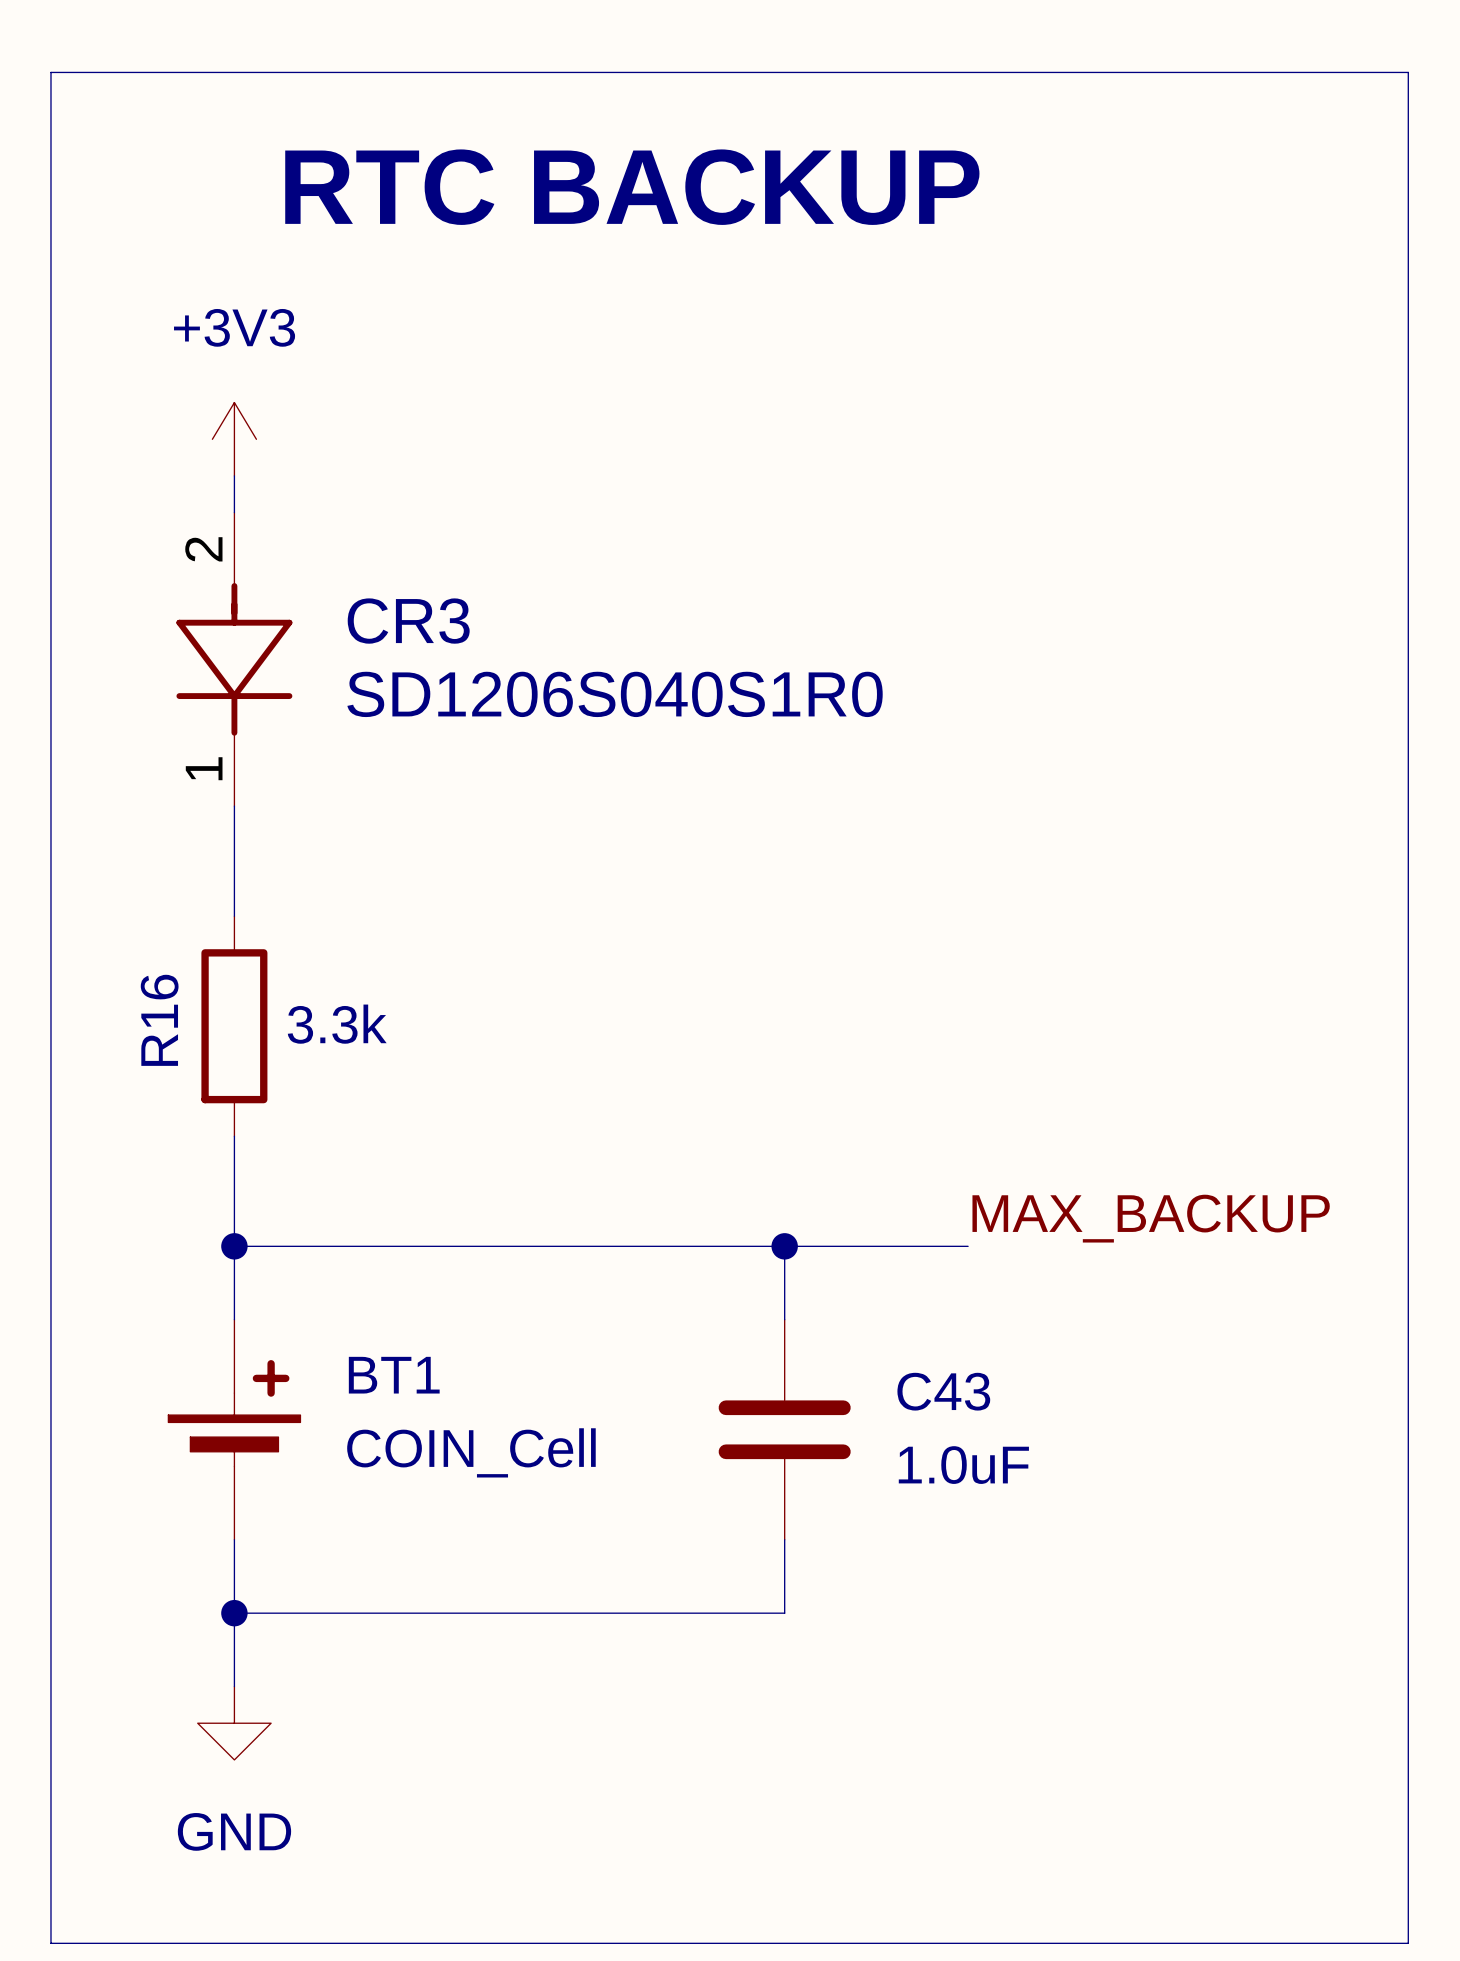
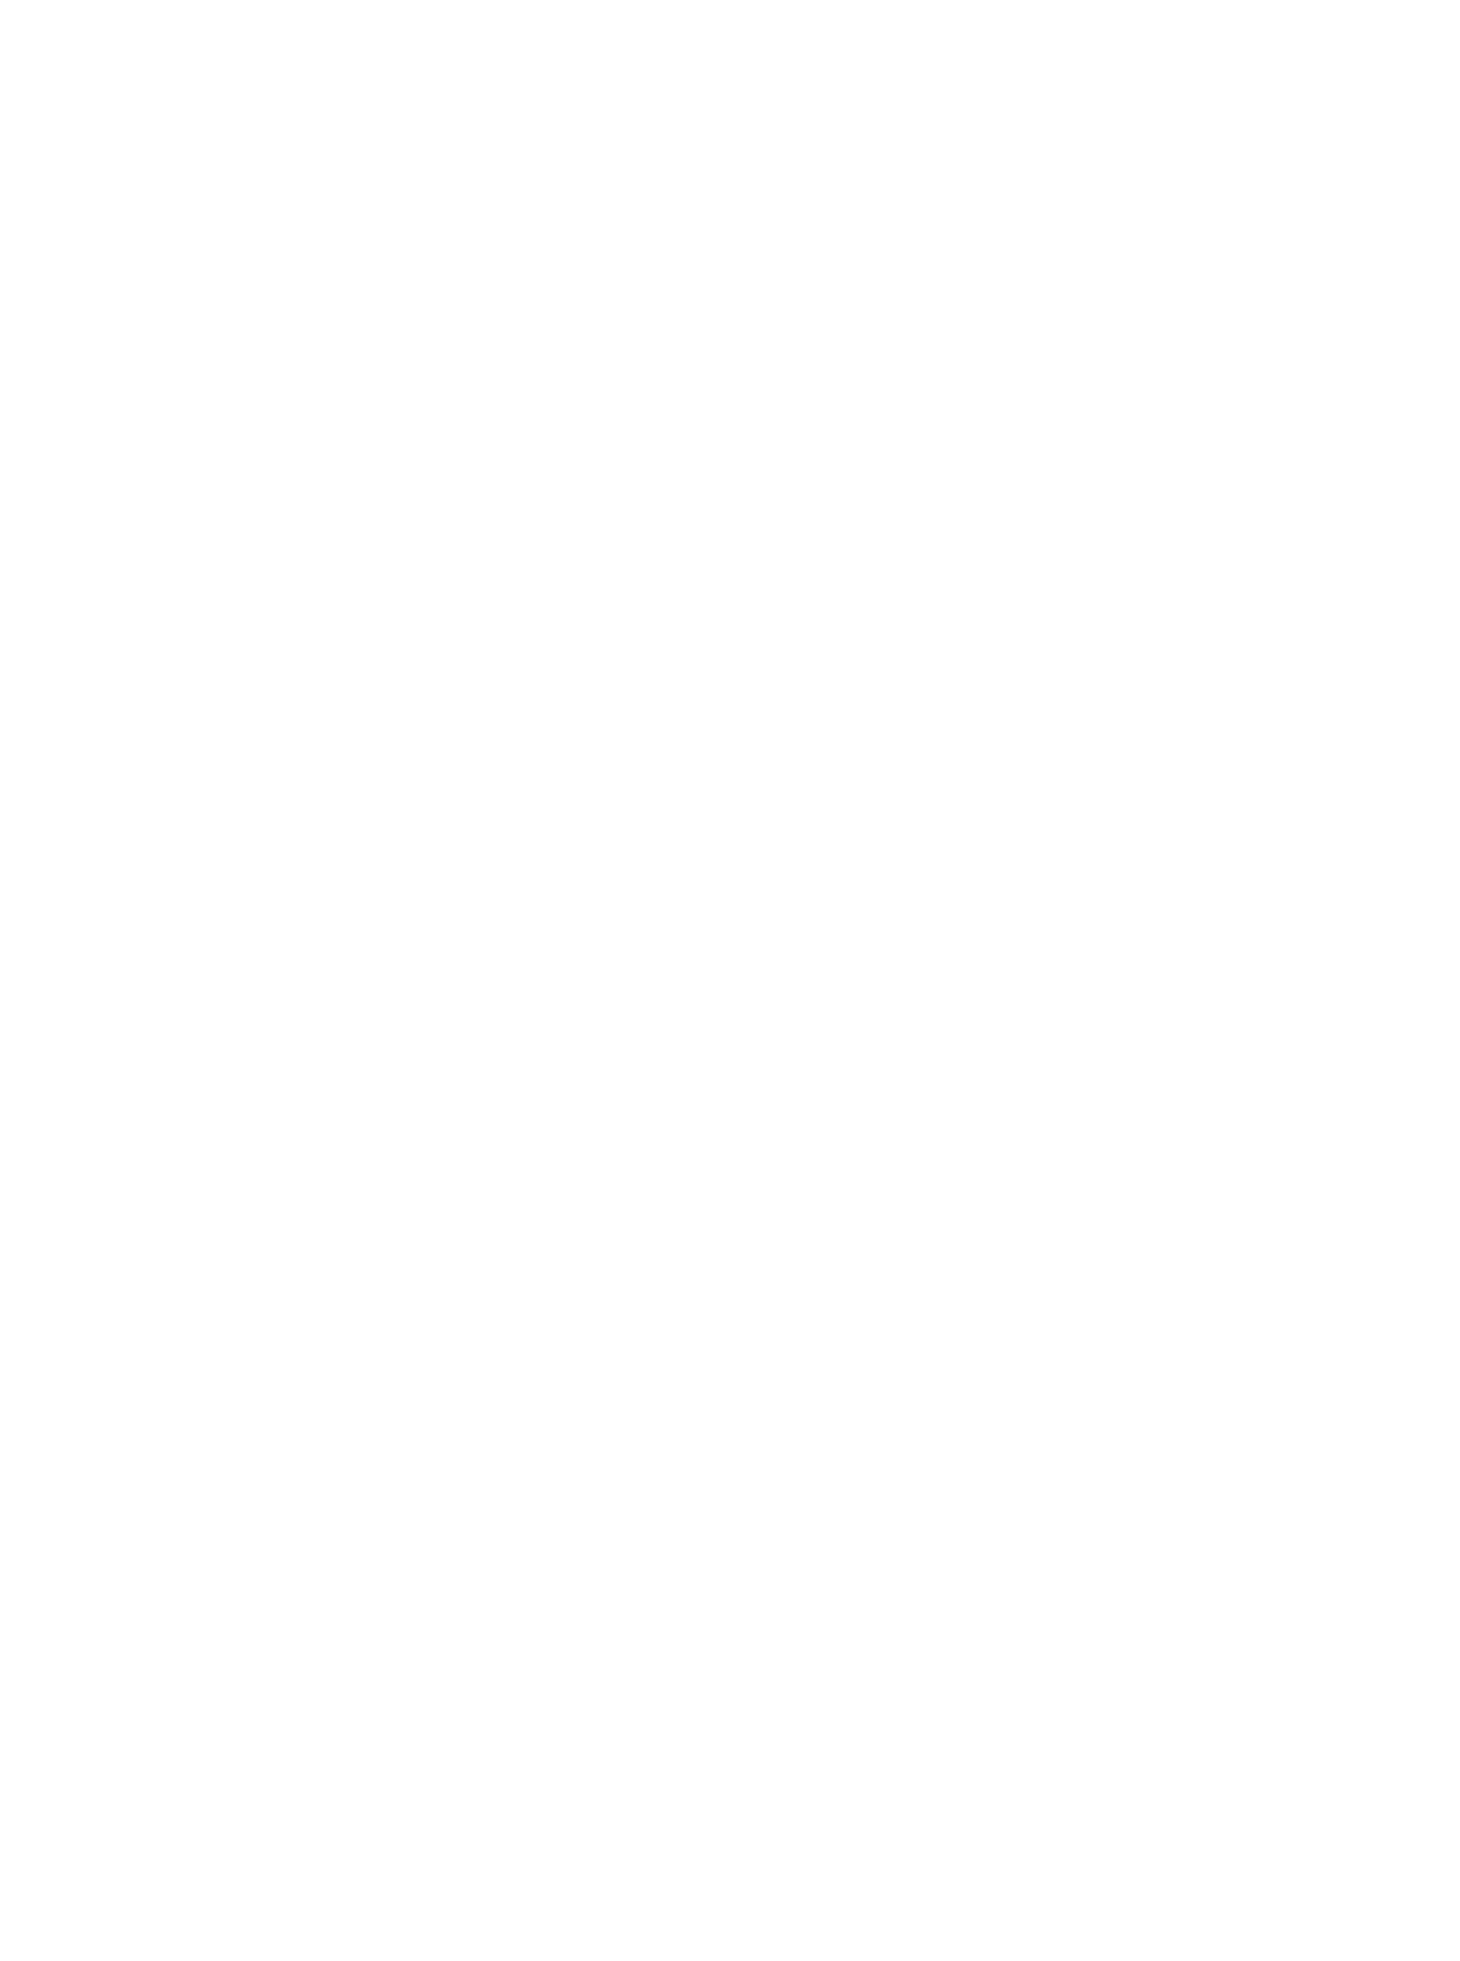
line: (50, 72) (1408, 72) (1408, 1943) (50, 1943) (50, 72) -> none
text: RTC BACKUP (632, 187) -> none
power symbol: +3V3 (234, 439) -> none
wire: (234, 475) (234, 512) -> none
CR3: SD1206S040S1R0 (234, 659) -> none
wire: (234, 806) (234, 916) -> none
R16: 3.3k (234, 1026) -> none
wire: (234, 1136) (234, 1319) -> none
label: MAX_BACKUP (1151, 1218) -> none
wire: (234, 1246) (968, 1246) -> none
junction: (234, 1246) -> none
wire: (784, 1246) (784, 1319) -> none
junction: (784, 1246) -> none
BT1: COIN_Cell (234, 1429) -> none
C43: 1.0uF (784, 1429) -> none
wire: (234, 1539) (234, 1686) -> none
wire: (784, 1539) (784, 1613) (234, 1613) -> none
junction: (234, 1613) -> none
power symbol: GND (234, 1723) -> none

